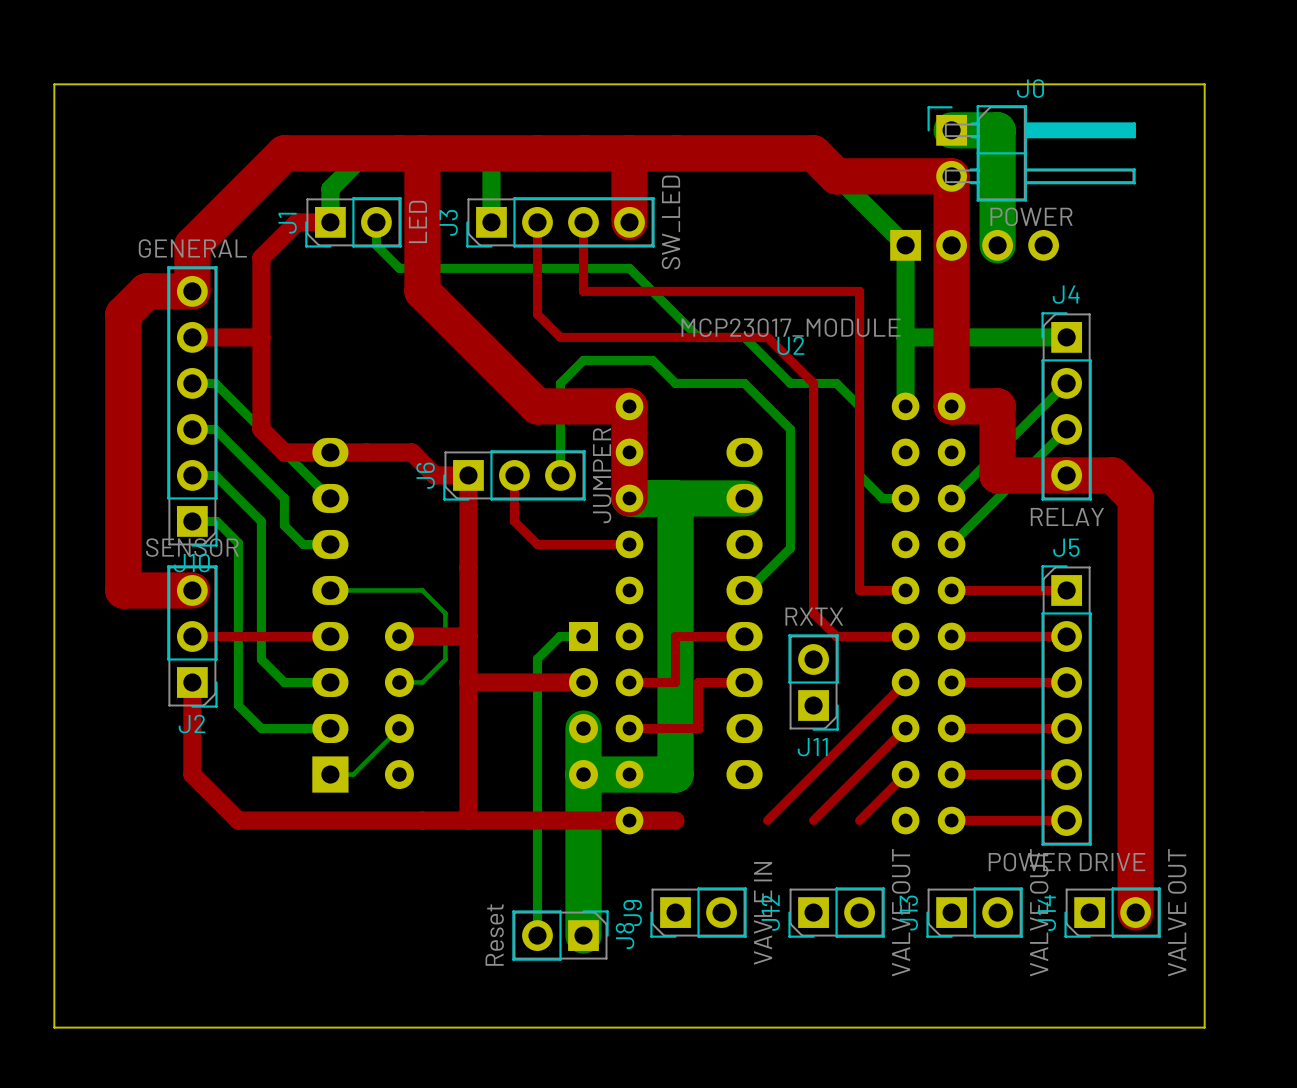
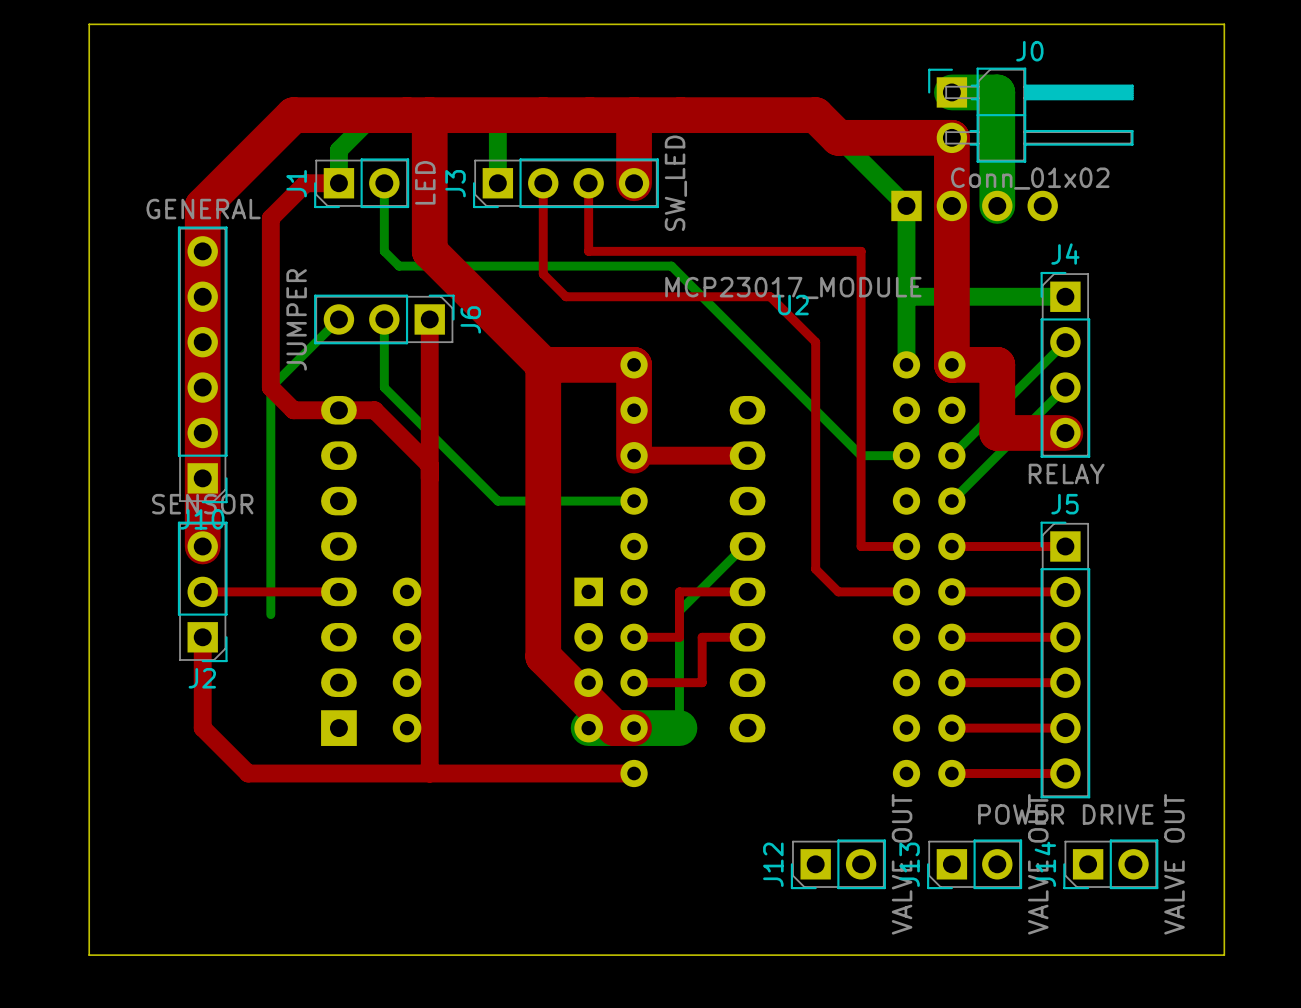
board edge: (54, 84) (1204, 84) (1204, 1027) (54, 1027) (54, 84) -> (89, 24) (1224, 24) (1224, 955) (89, 955) (89, 24)
J0 value: POWER (1031, 216) -> Conn_01x02 (1030, 178)
bottom track: (376, 245) (399, 268) (629, 268) (667, 306) -> (384, 205) (384, 251) (399, 266) (671, 266)
top track: (192, 291) (146, 291) (123, 314) (123, 590) (192, 590) -> (202, 251) (202, 546)
top track: (192, 337) (261, 337) -> none
bottom track: (698, 337) (744, 337) (790, 383) (836, 383) (859, 406) (859, 475) (882, 498) -> (792, 387) (861, 455) (883, 455)
bottom track: none -> (384, 319) (384, 387) (497, 501) (634, 501)
top track: none -> (429, 319) (429, 773)
bottom track: (192, 383) (215, 383) (330, 498) -> none
bottom track: (744, 383) (675, 383) (652, 360) (583, 360) (560, 383) (560, 475) -> (747, 342) (702, 296)
top track: none -> (543, 364) (543, 656) (614, 728) (634, 728)
bottom track: (192, 429) (215, 429) (284, 498) (284, 525) (303, 544) (330, 544) -> none
bottom track: (790, 429) (790, 548) (748, 590) (744, 590) -> none
top track: (366, 452) (411, 452) (434, 475) (468, 475) (468, 820) -> (374, 410) (429, 465)
bottom track: (192, 475) (215, 475) (261, 521) -> (338, 319) (270, 387) (270, 478)
top track: (514, 475) (514, 521) (537, 544) (629, 544) -> none
J6 rotation: 0° (514, 475) -> 180° (384, 319)
J6 position: (514, 475) -> (384, 319)
top track: (1066, 475) (1112, 475) (1135, 498) (1135, 912) -> none
bottom track: (629, 498) (744, 498) -> none
bottom track: (675, 498) (675, 655) -> (744, 546) (679, 611)
bottom track: (192, 521) (216, 521) (238, 543) (238, 705) (261, 728) (330, 728) -> none
bottom track: (330, 590) (422, 590) (445, 613) (445, 659) (422, 682) (399, 682) -> none
top track: (399, 636) (468, 636) -> none
bottom track: (583, 636) (559, 636) (537, 658) (537, 935) -> none
bottom track width: thick (675, 655) (675, 774) -> thin (679, 611) (679, 728)
bottom track: (261, 659) (284, 682) (330, 682) -> none
top track: (468, 682) (583, 682) -> (634, 455) (747, 455)
J11: RXTX (813, 682) -> none
top track: (905, 682) (767, 820) -> none
bottom track: (399, 728) (353, 774) (330, 774) -> none
bottom track: (583, 728) (583, 935) -> none
top track: (905, 728) (813, 820) -> none
top track: (905, 774) (859, 820) -> none
top track: (629, 820) (675, 820) -> none
J9: VAVLE IN (698, 912) -> none
J8: Reset (560, 935) -> none

